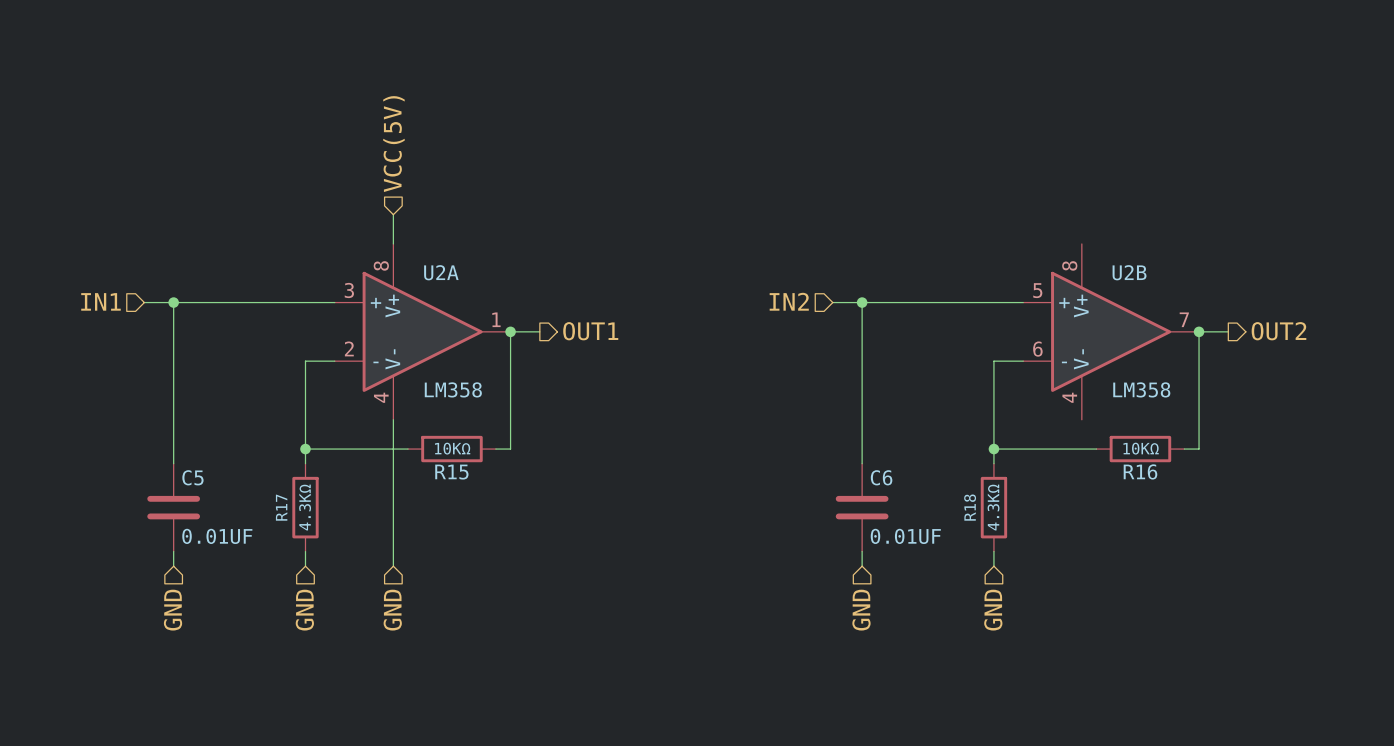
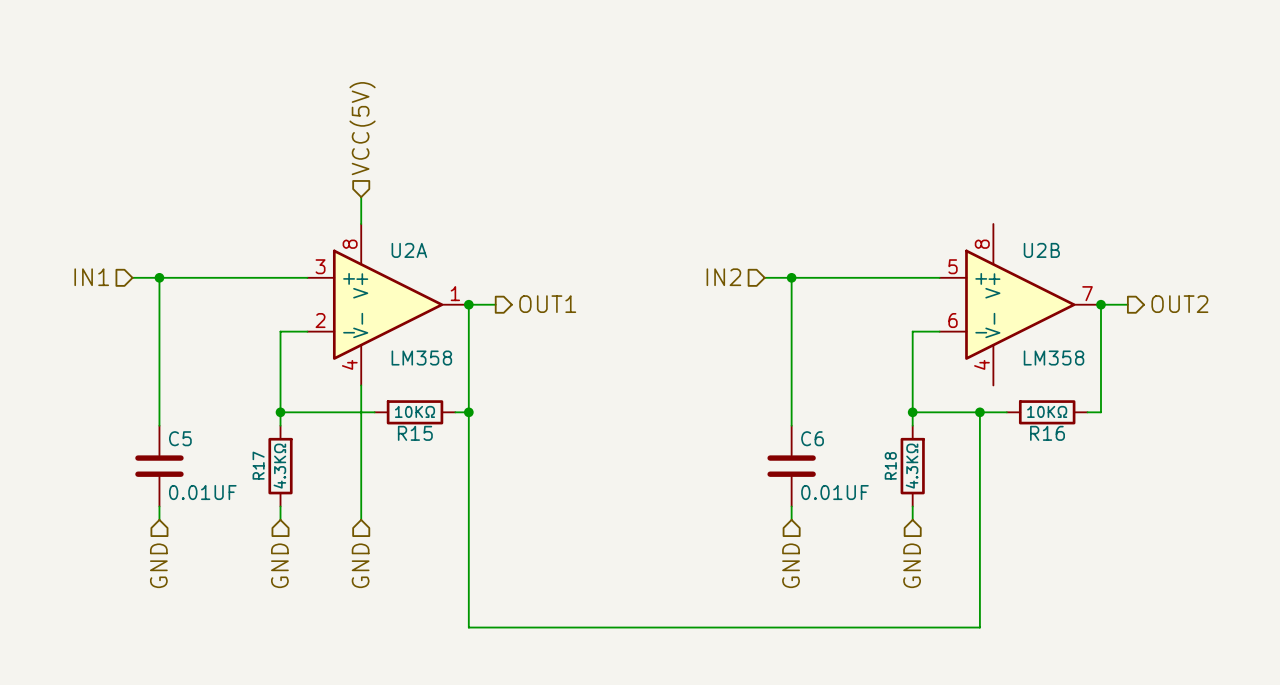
wire: none -> (468, 412) (468, 627) (979, 627) (979, 412)
junction: none -> (468, 412)
junction: none -> (979, 412)

